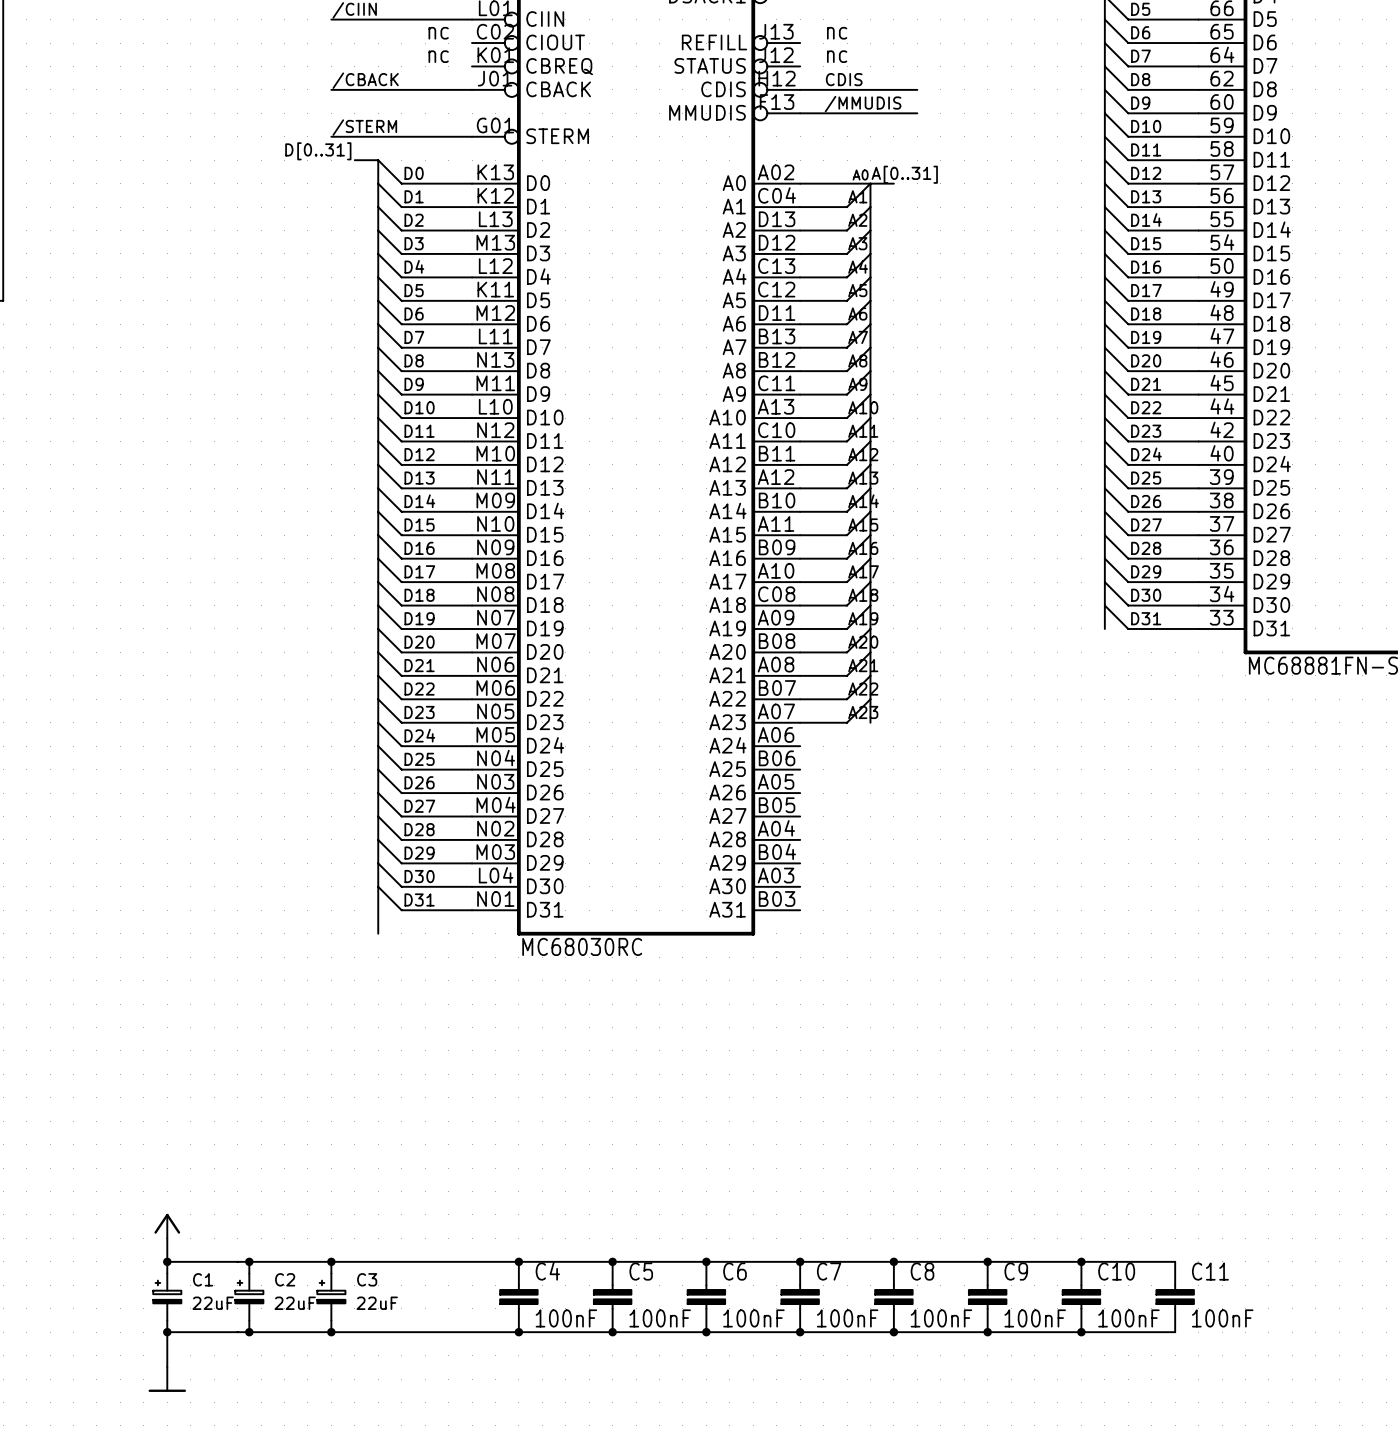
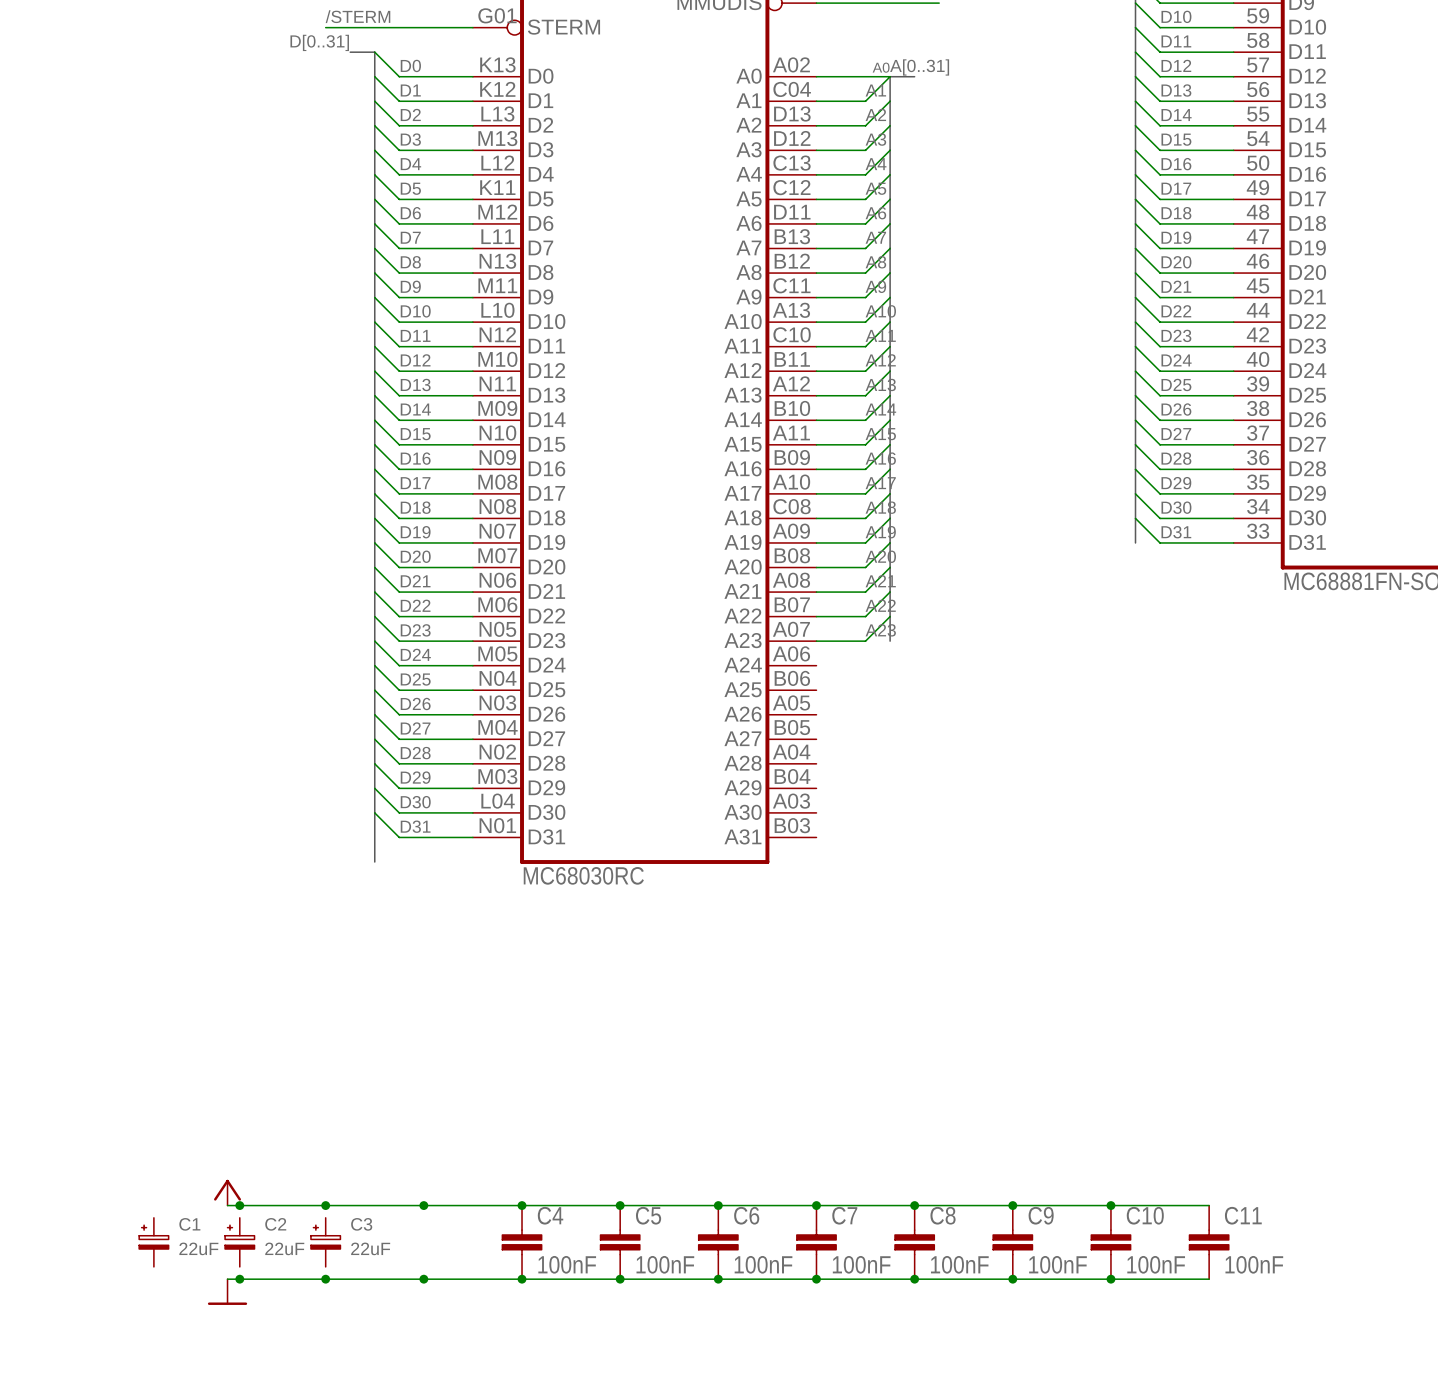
power symbol position: (167, 1226) -> (227, 1192)
wire: (167, 1238) (167, 1273) -> none
wire: (167, 1261) (237, 1261) -> none
junction: (167, 1261) -> none
wire: (249, 1261) (249, 1273) -> none
wire: (331, 1261) (331, 1273) -> none
junction: none -> (423, 1205)
wire: (167, 1320) (167, 1367) -> none
wire: (249, 1320) (249, 1332) -> none
wire: (331, 1320) (331, 1332) -> none
wire: (167, 1332) (237, 1332) -> none
junction: (167, 1332) -> none
junction: none -> (423, 1279)
power symbol position: (167, 1379) -> (227, 1292)

